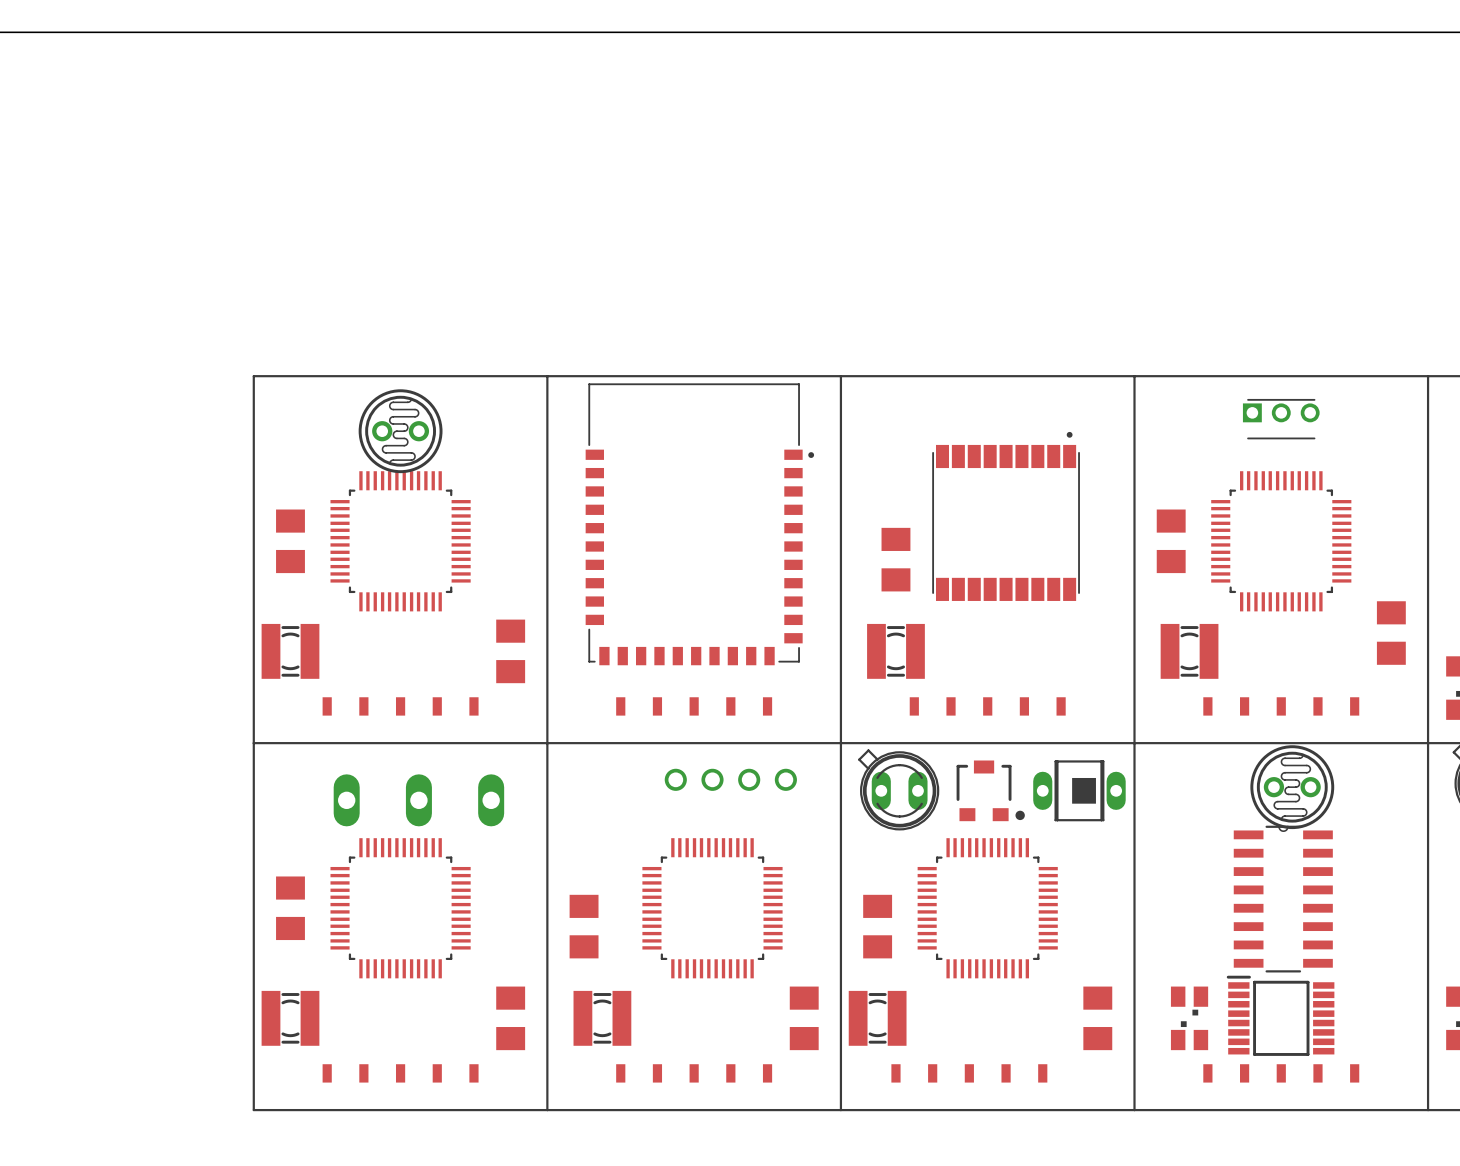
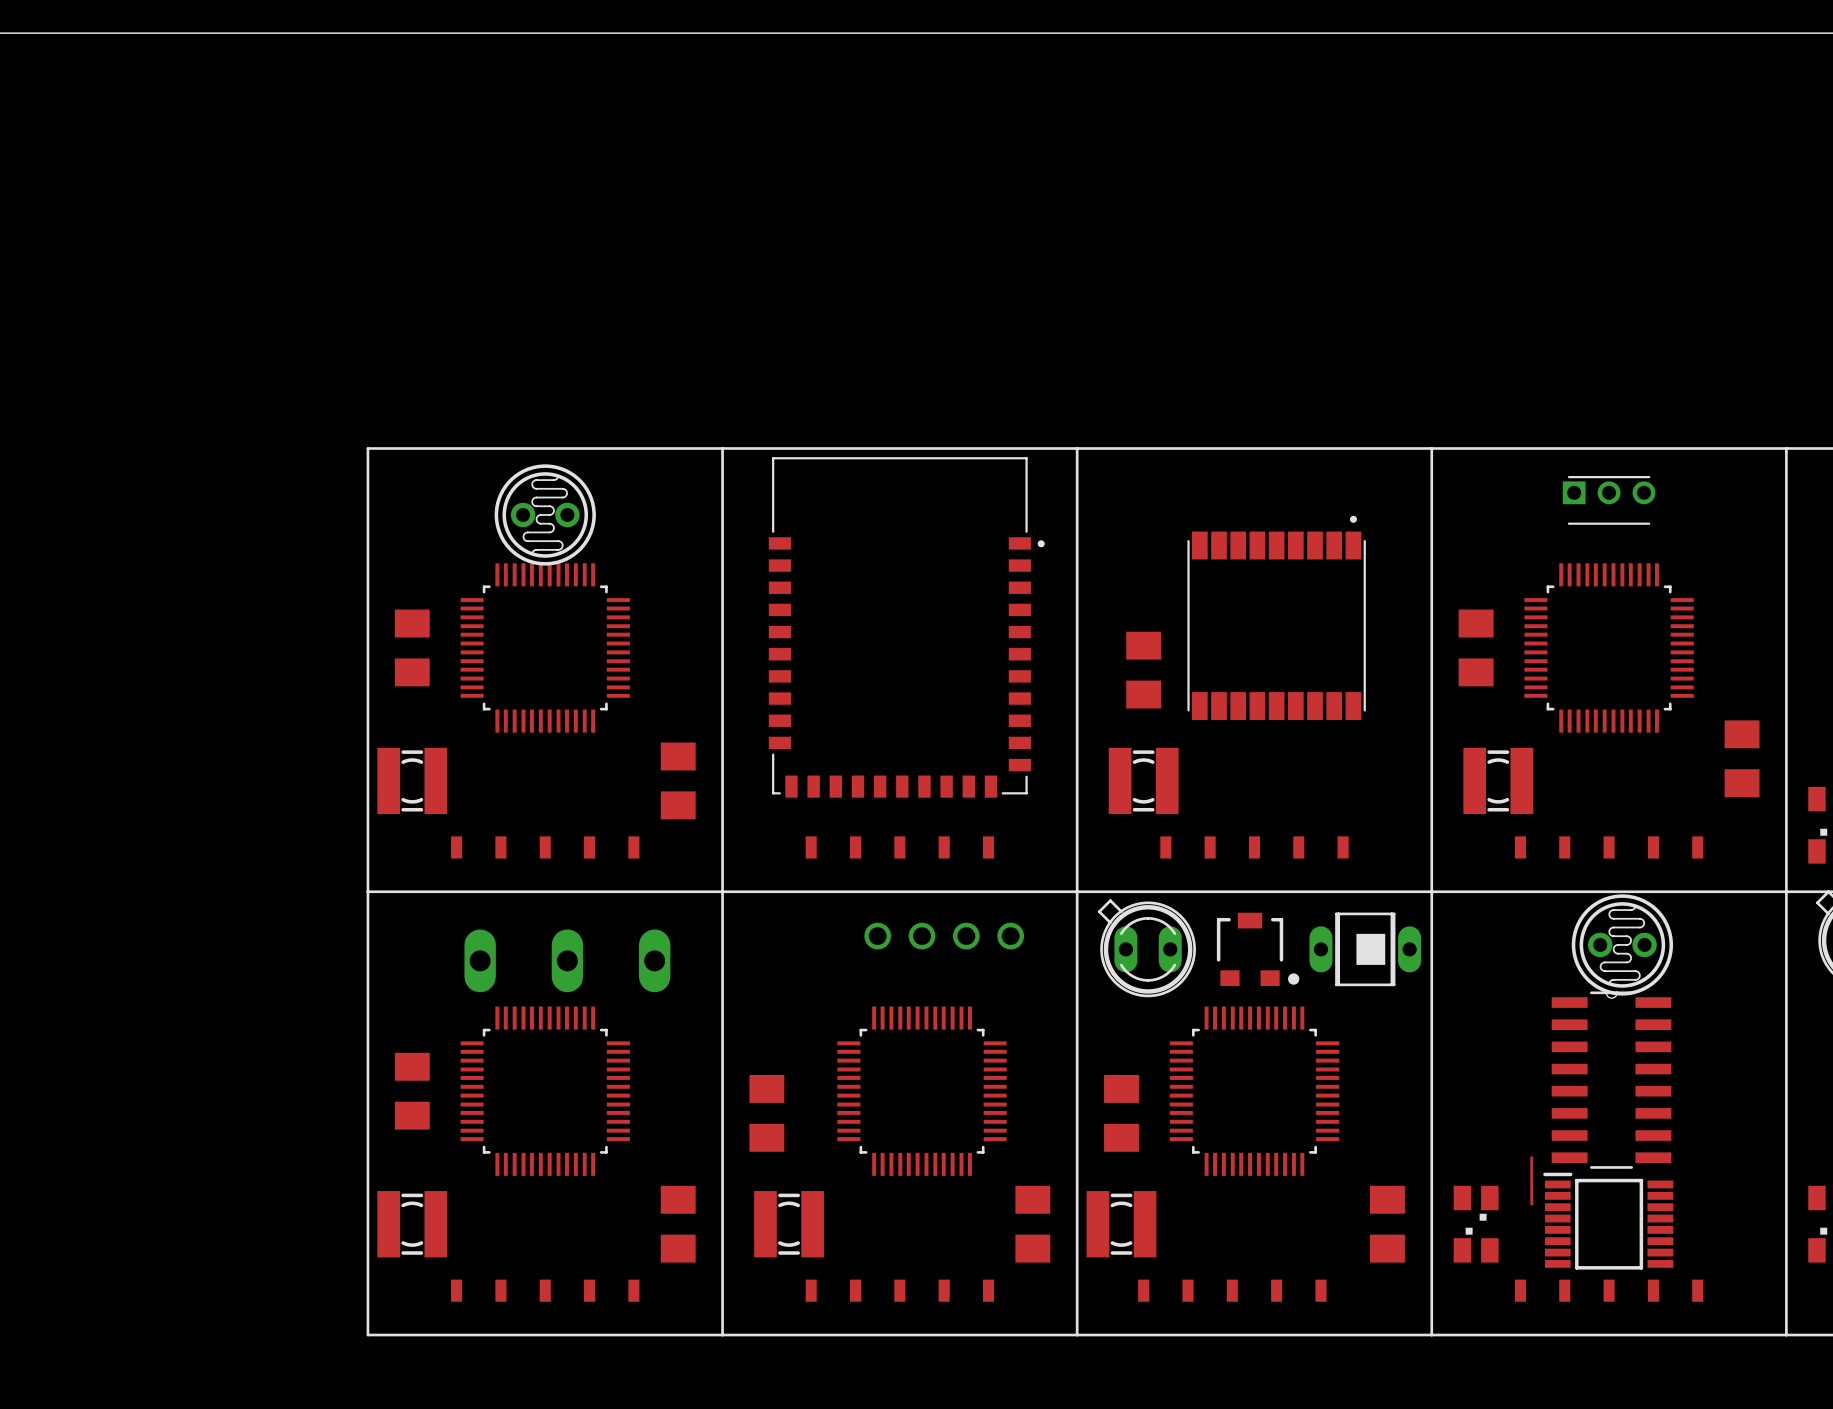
track: none -> (1531, 1157) (1531, 1204)
part position: (1189, 1018) -> (1476, 1224)

